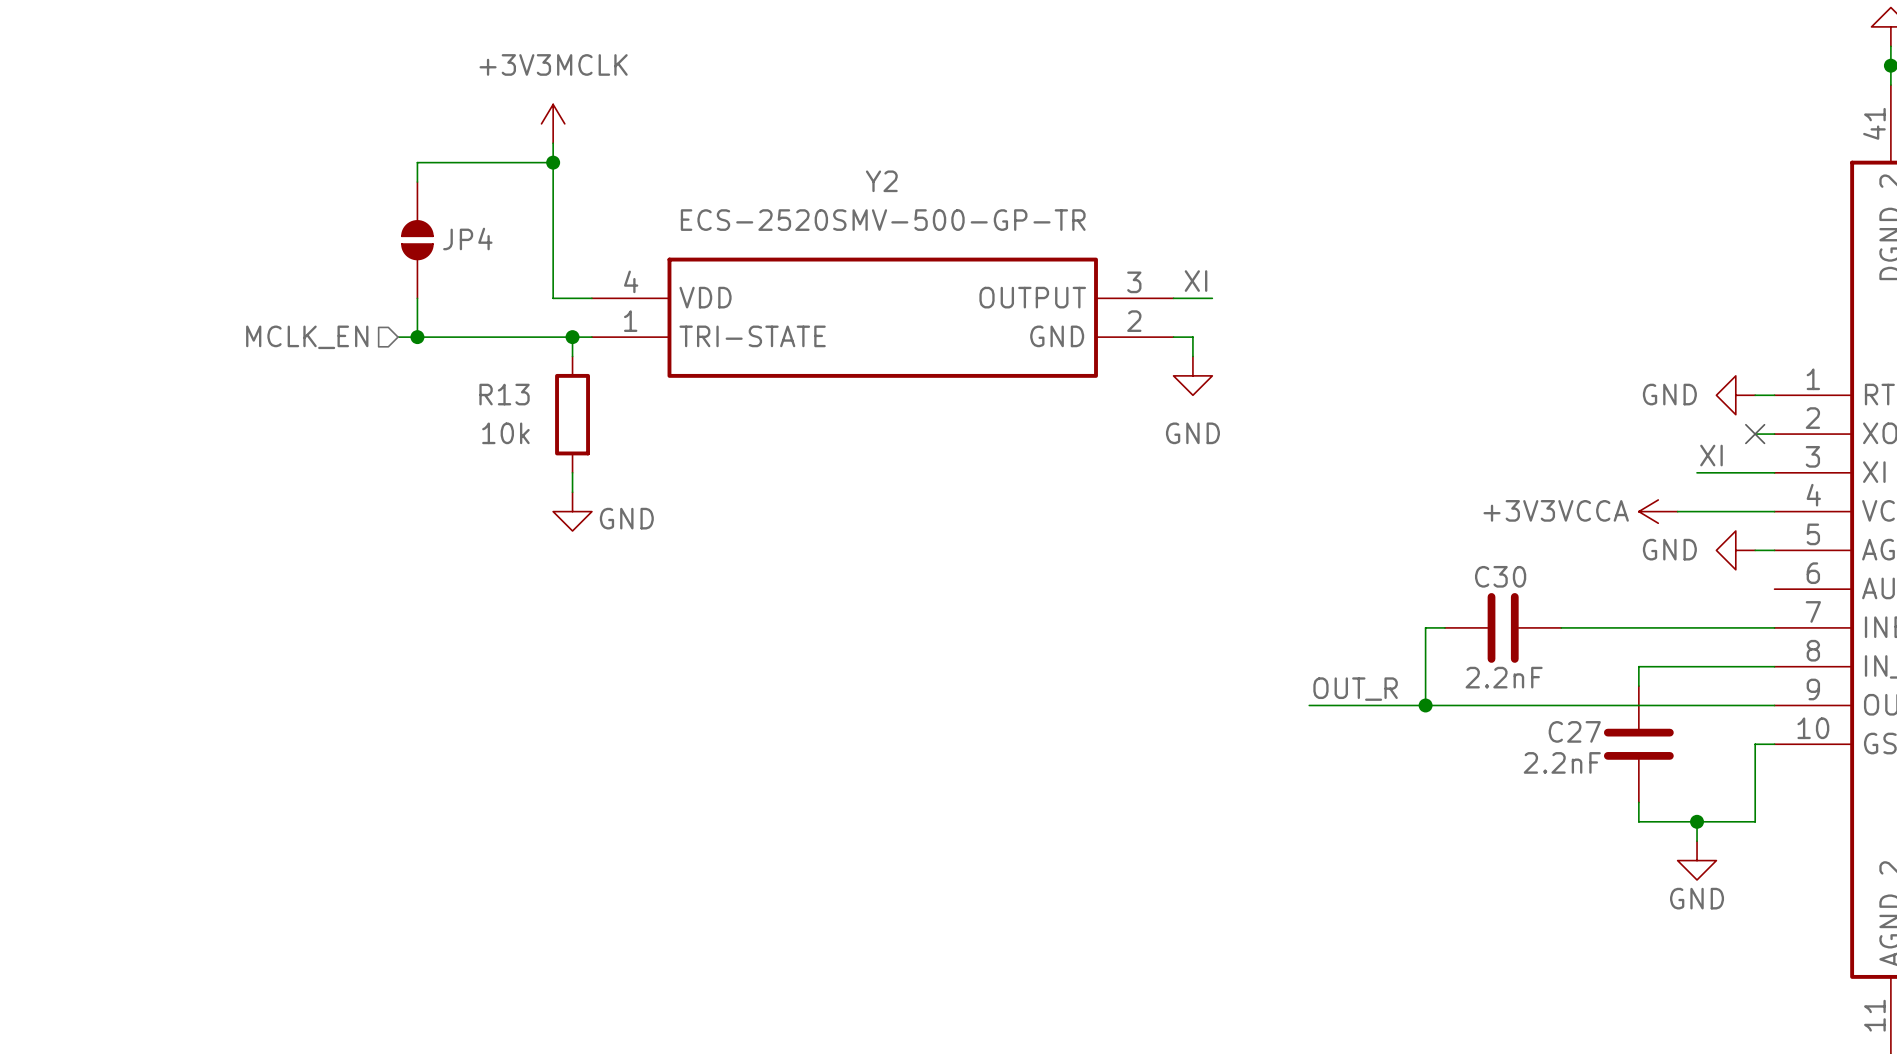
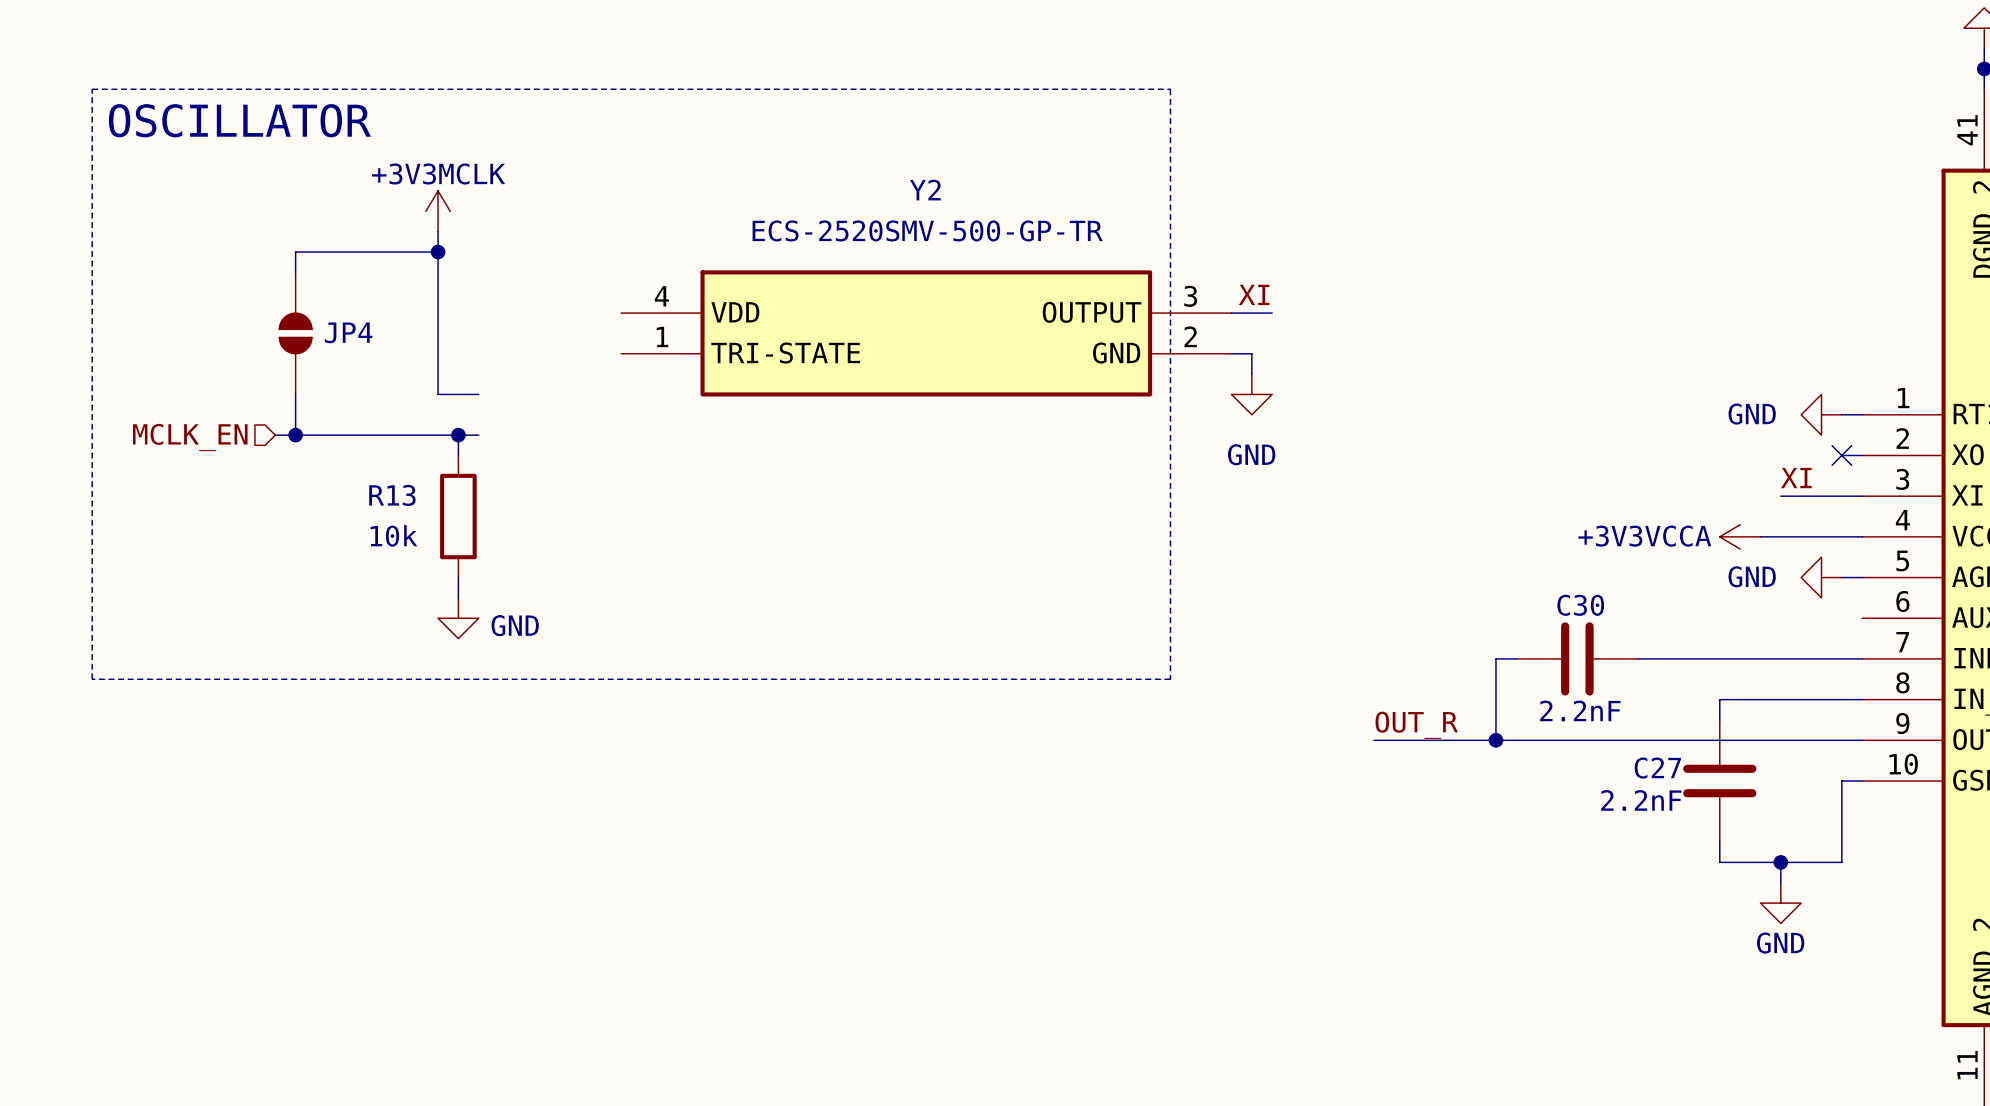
power symbol text position: +3V3MCLK (553, 64) -> +3V3MCLK (438, 173)
line: none -> (92, 89) (1170, 89) (1170, 679) (92, 679) (92, 89)
text: none -> OSCILLATOR (239, 120)
power symbol position: +3V3MCLK (553, 123) -> +3V3MCLK (438, 211)
wire: (553, 143) (553, 298) (591, 298) -> none
wire: (553, 162) (417, 162) (417, 182) -> (438, 252) (295, 252) (295, 272)
junction: (553, 162) -> none
junction: none -> (438, 252)
JP4 position: (417, 240) -> (295, 333)
hierarchical label position: MCLK_EN (307, 337) -> MCLK_EN (190, 437)
wire: (398, 337) (591, 337) -> (275, 435) (478, 435)
wire: none -> (438, 353) (438, 394) (478, 394)
junction: (417, 337) -> none
wire: (572, 337) (572, 356) -> (458, 435) (458, 455)
junction: (572, 337) -> none
wire: none -> (295, 394) (295, 435)
junction: none -> (295, 435)
junction: none -> (458, 435)
R13 position: (572, 414) -> (458, 516)
wire: (572, 472) (572, 492) -> (458, 577) (458, 597)
power symbol position: GND (572, 511) -> GND (458, 618)

